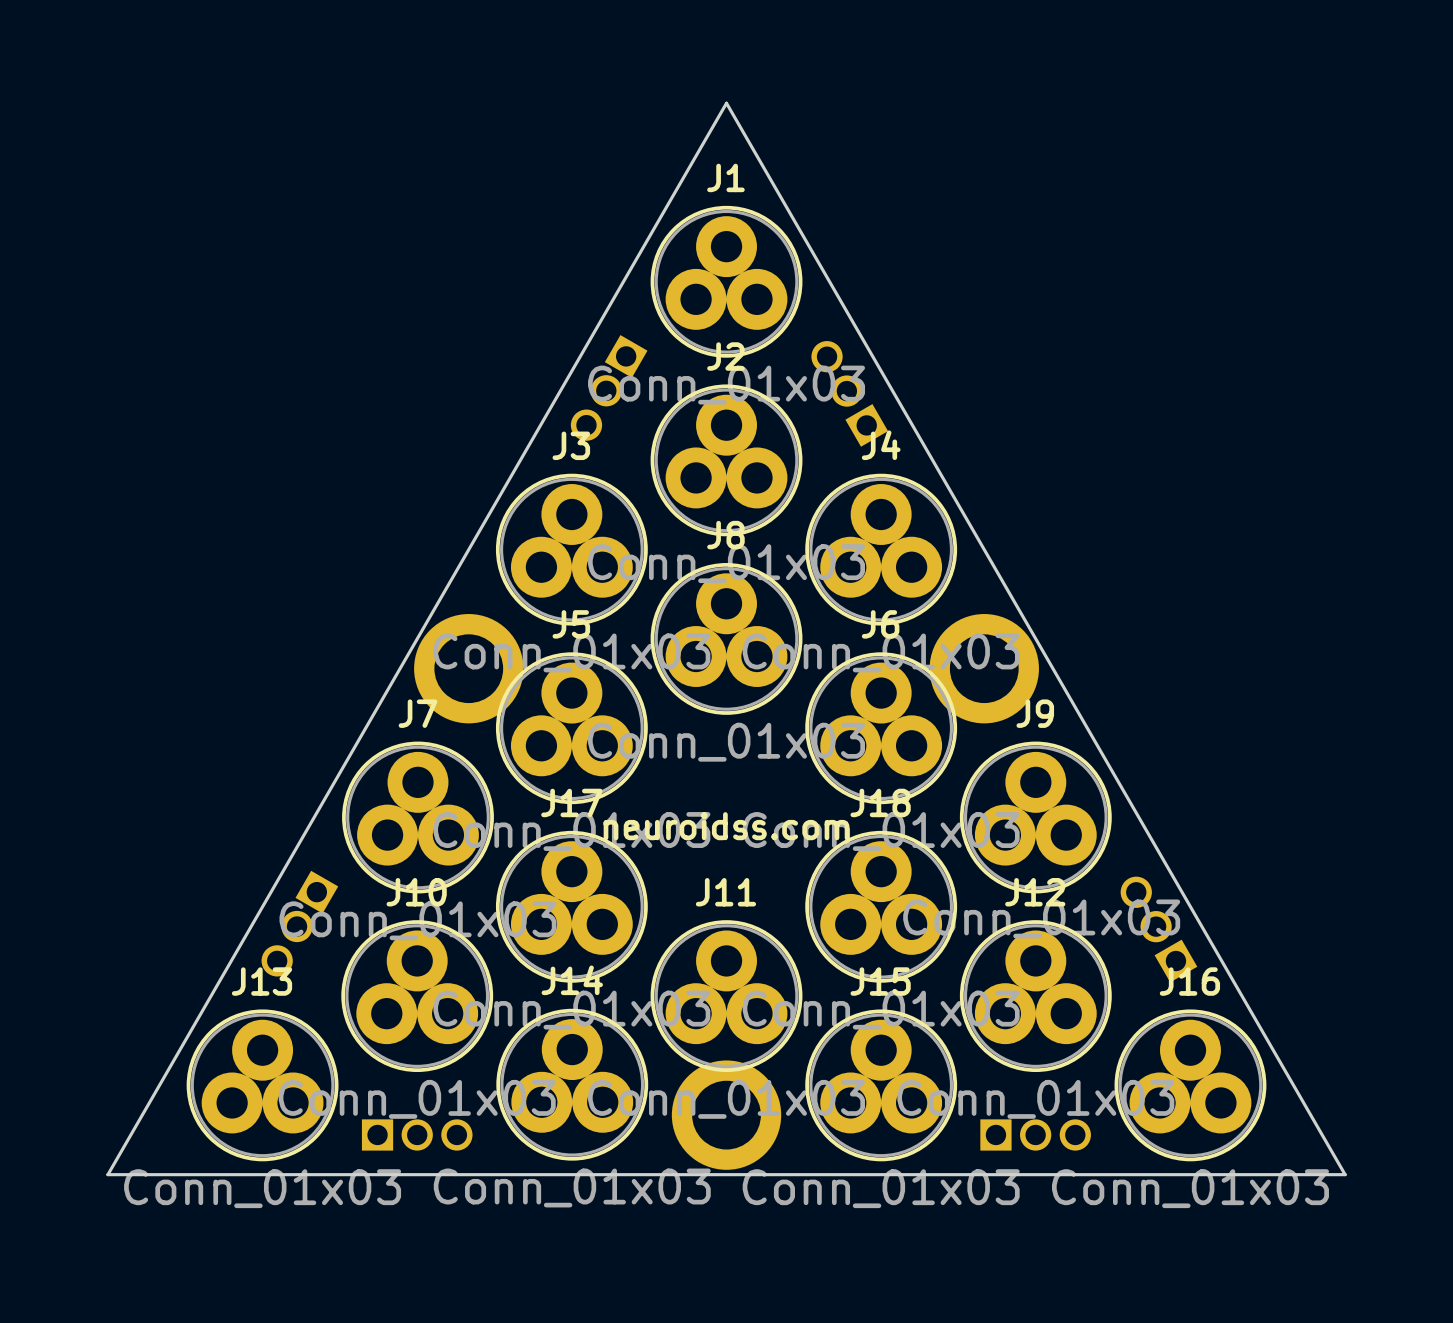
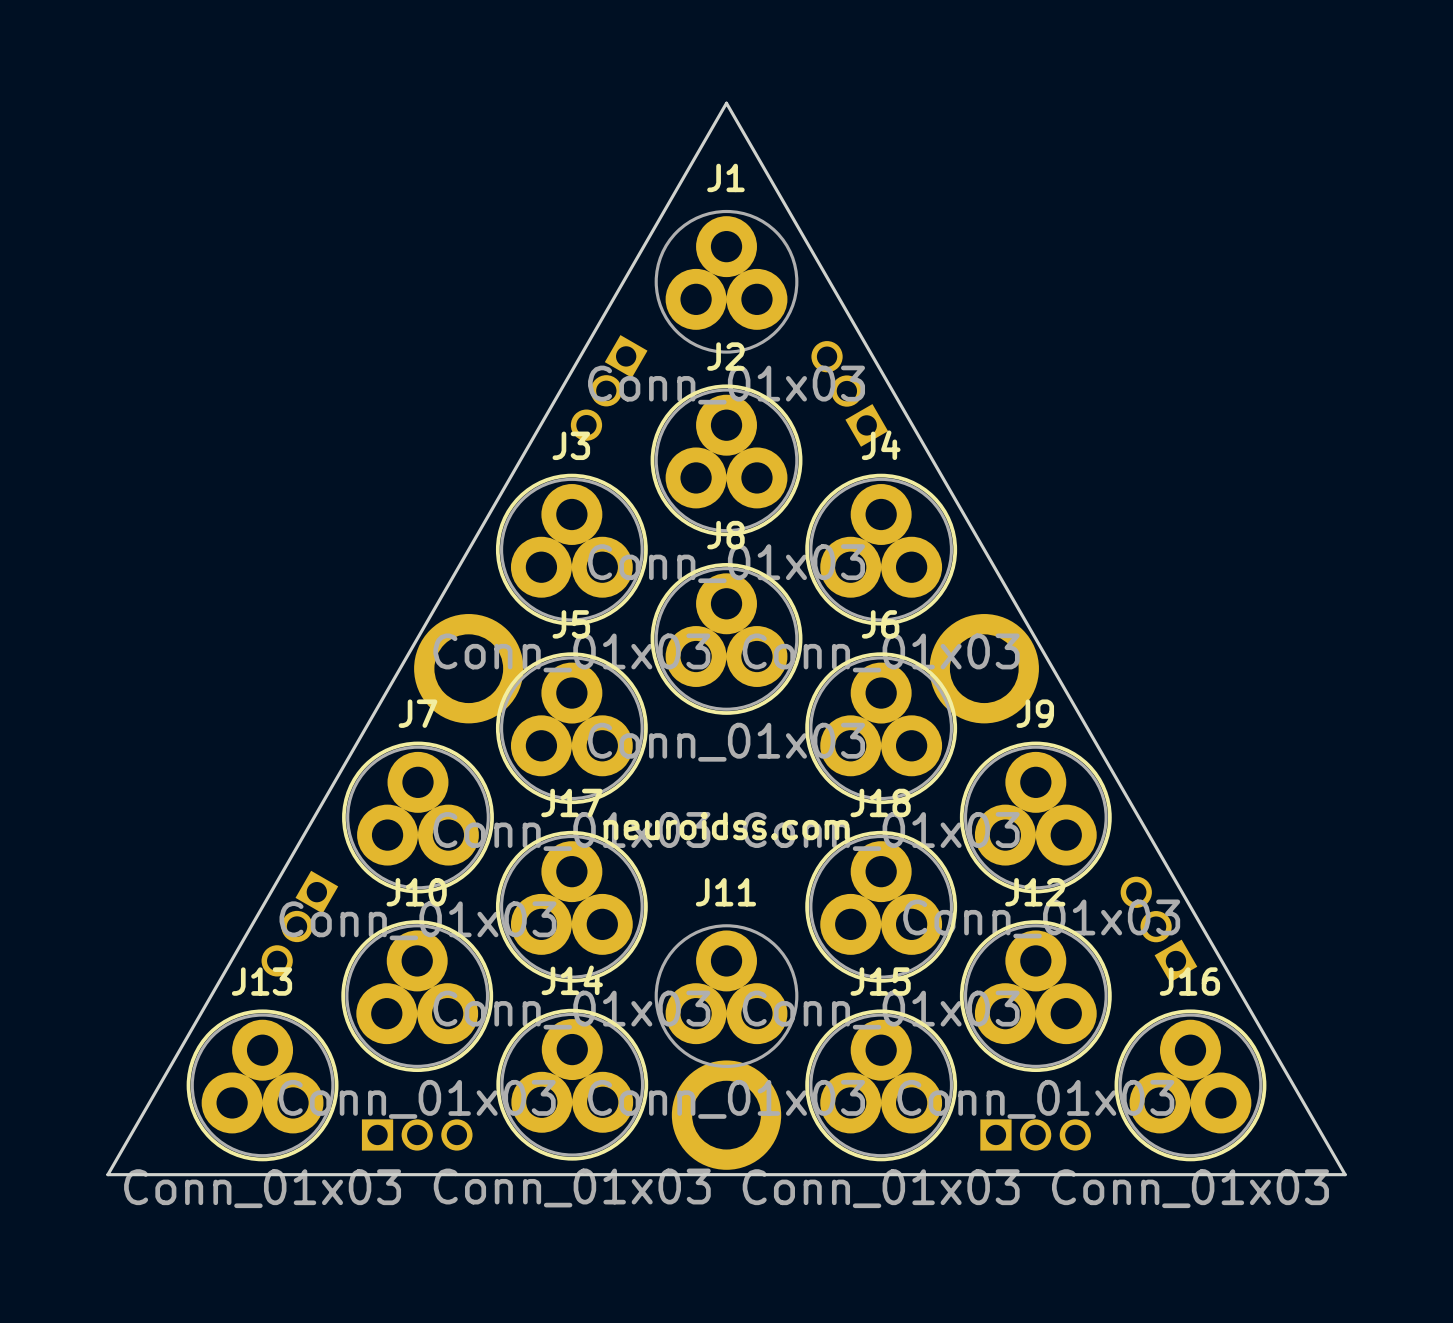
J1 footprint: [650, 205, 803, 358] -> [654, 209, 799, 354]
J11 footprint: [650, 920, 803, 1073] -> [654, 924, 799, 1068]

